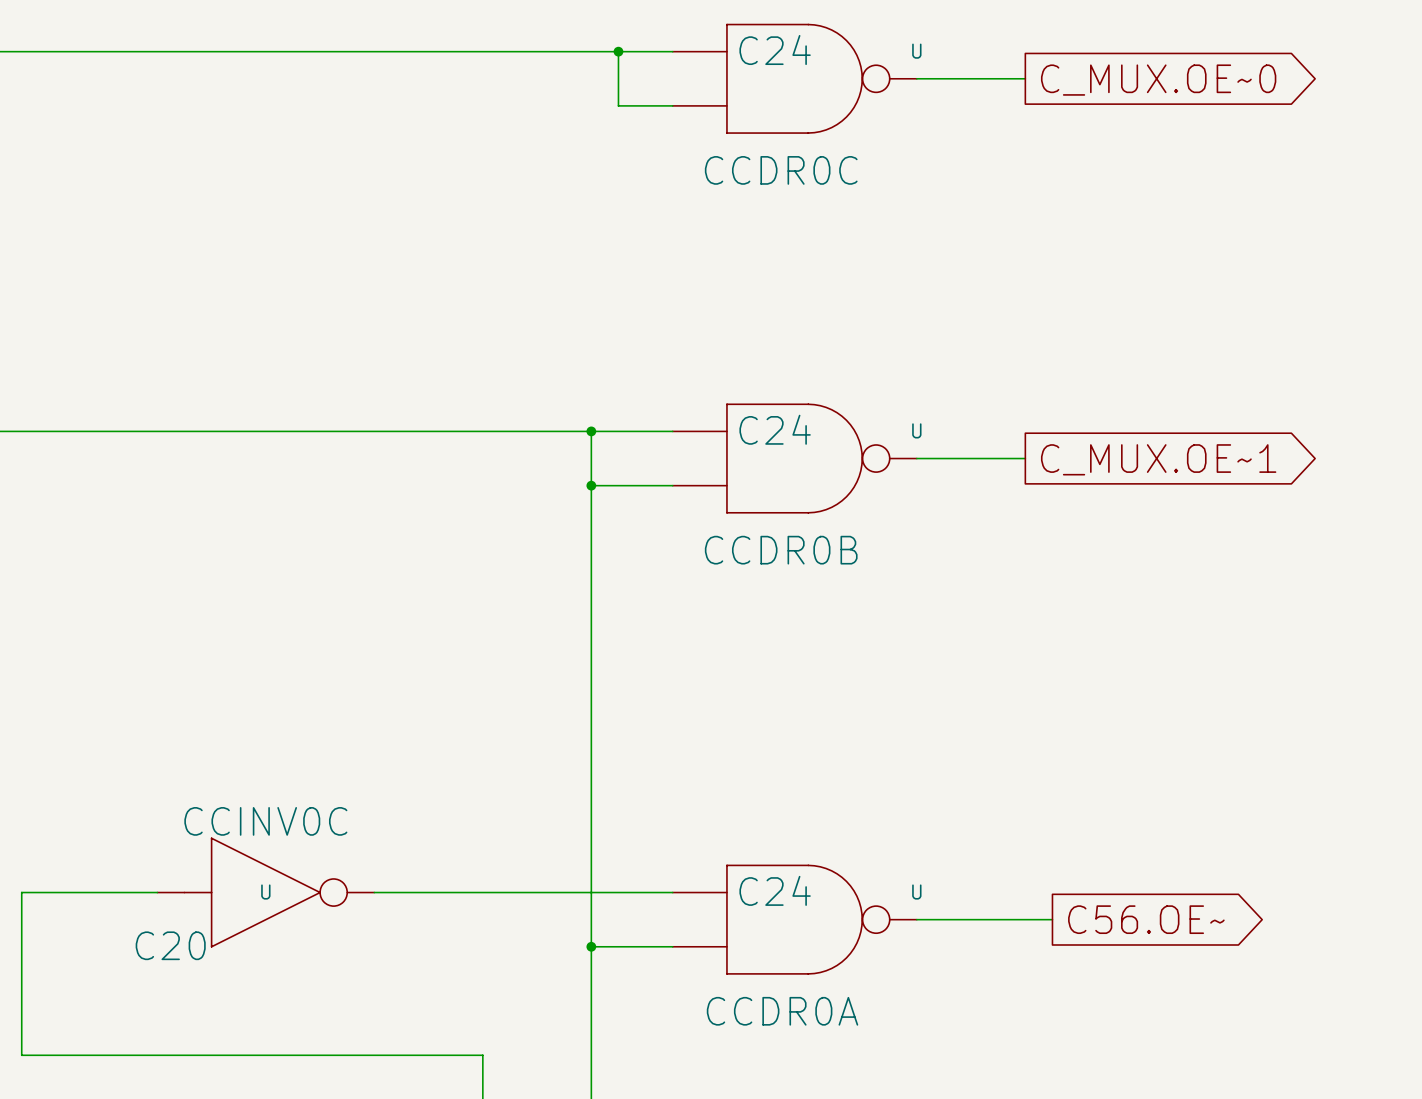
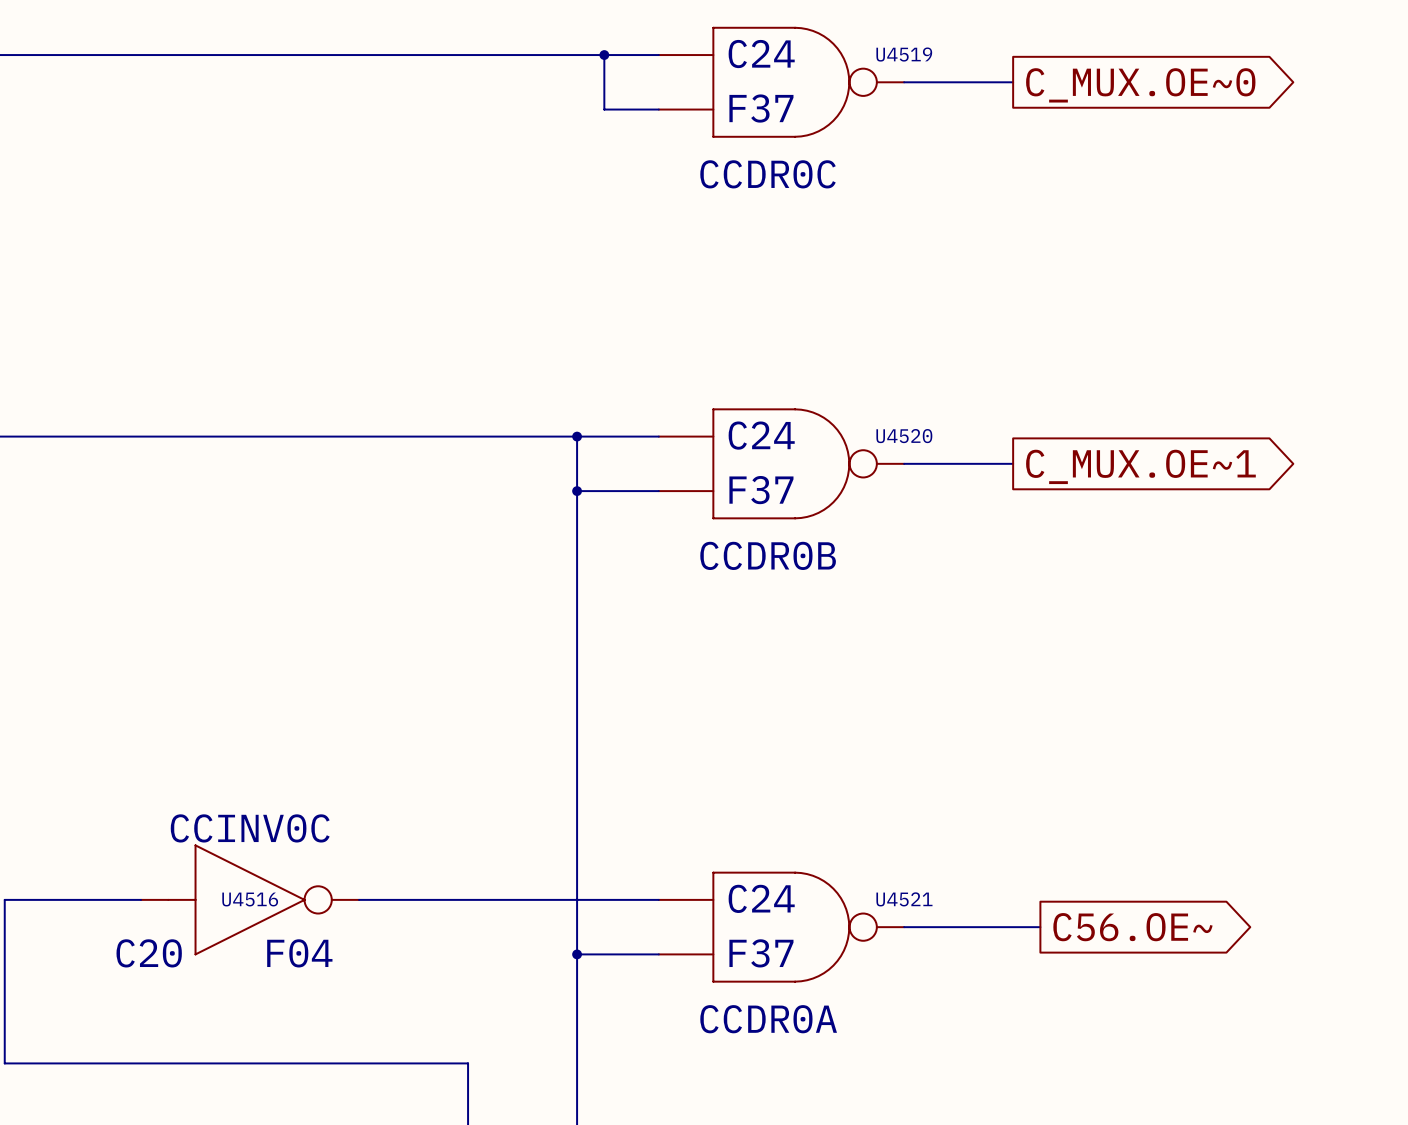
U name: U (916, 51) -> U4519 (904, 54)
U value: none -> F37 (761, 108)
U name: U (916, 430) -> U4520 (904, 436)
U value: none -> F37 (761, 490)
U name: U (265, 892) -> U4516 (250, 899)
U name: U (916, 892) -> U4521 (904, 899)
U value: none -> F04 (299, 953)
U value: none -> F37 (761, 953)

